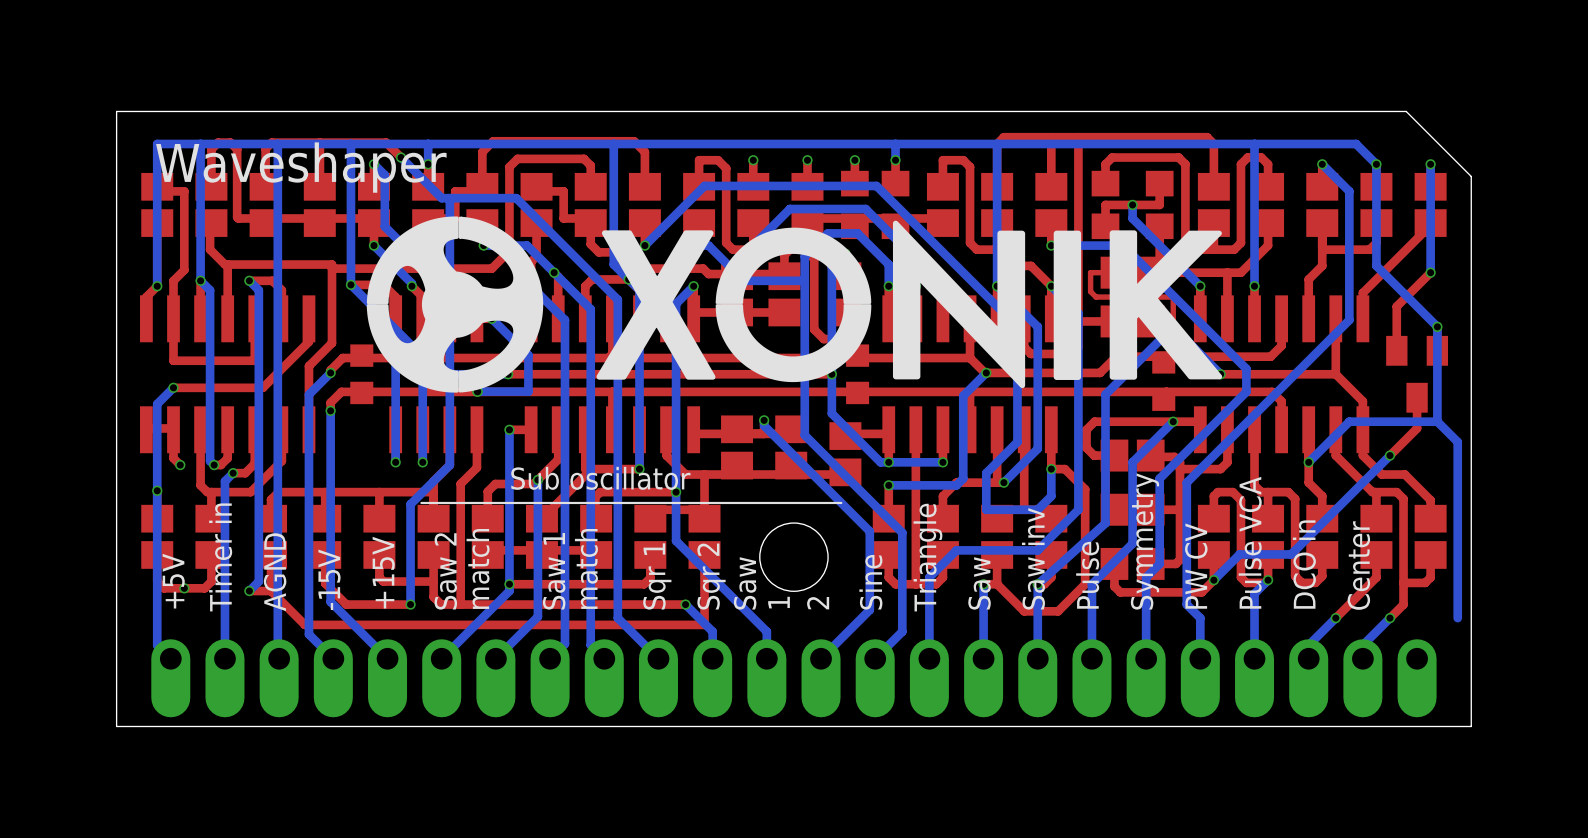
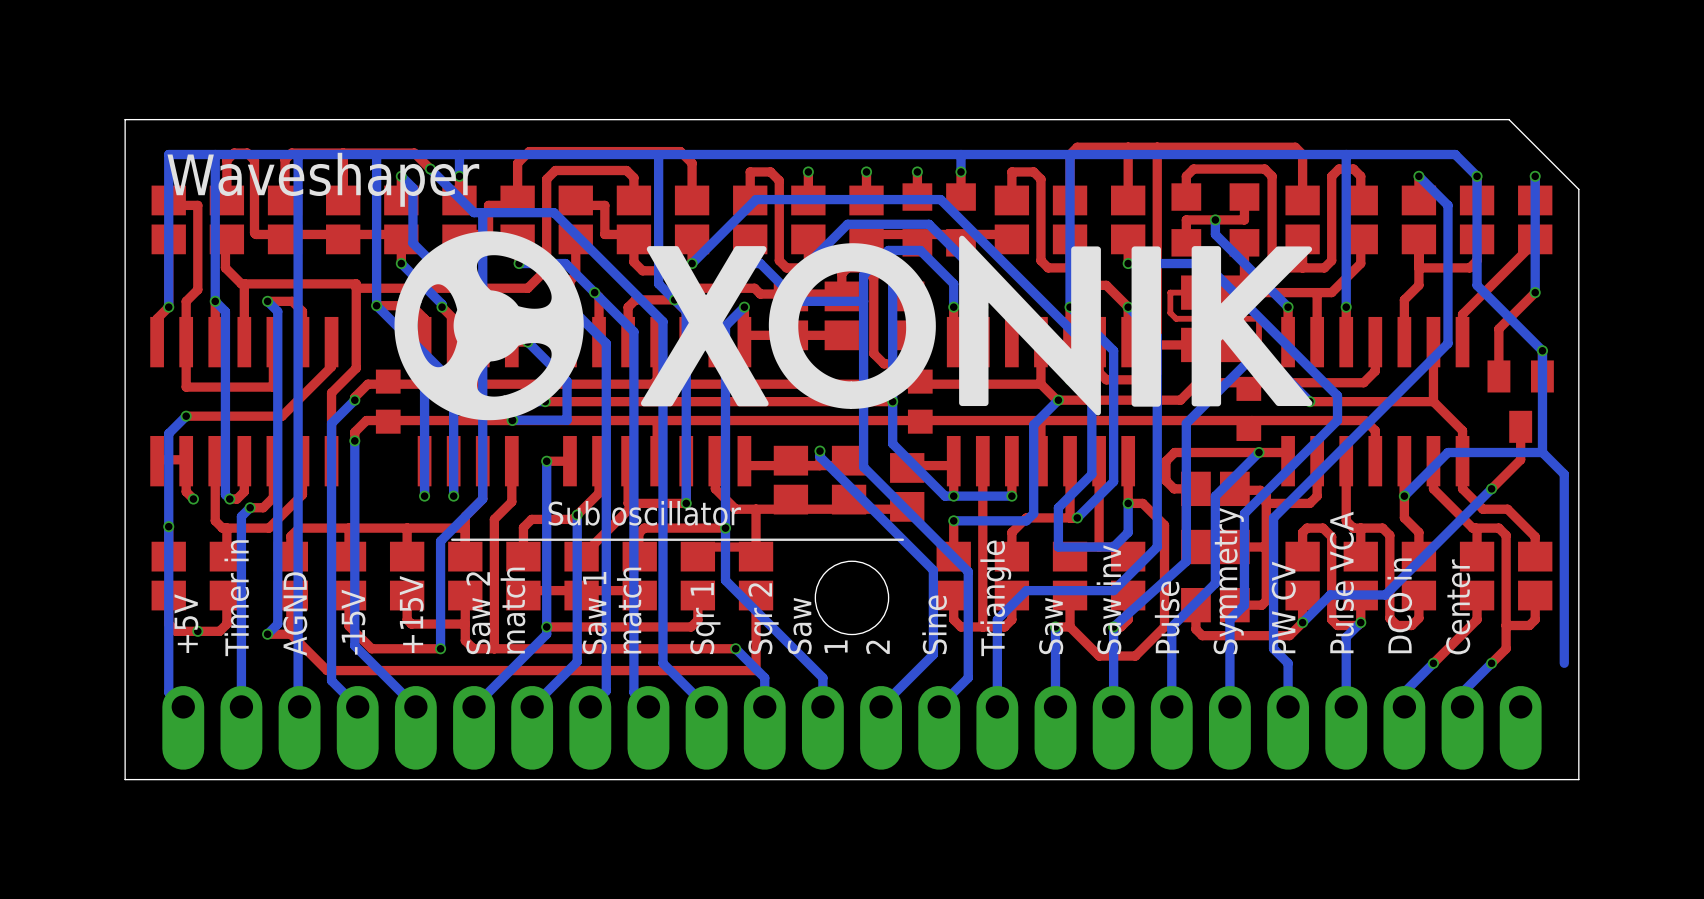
drawing: none -> [394, 231, 584, 421]
drawing shape: [366, 216, 1223, 393] -> [768, 243, 936, 409]
drawing: none -> [959, 235, 1101, 416]
drawing: none -> [641, 246, 769, 407]
drawing: none -> [1131, 246, 1162, 407]
drawing: none -> [1191, 246, 1313, 407]

